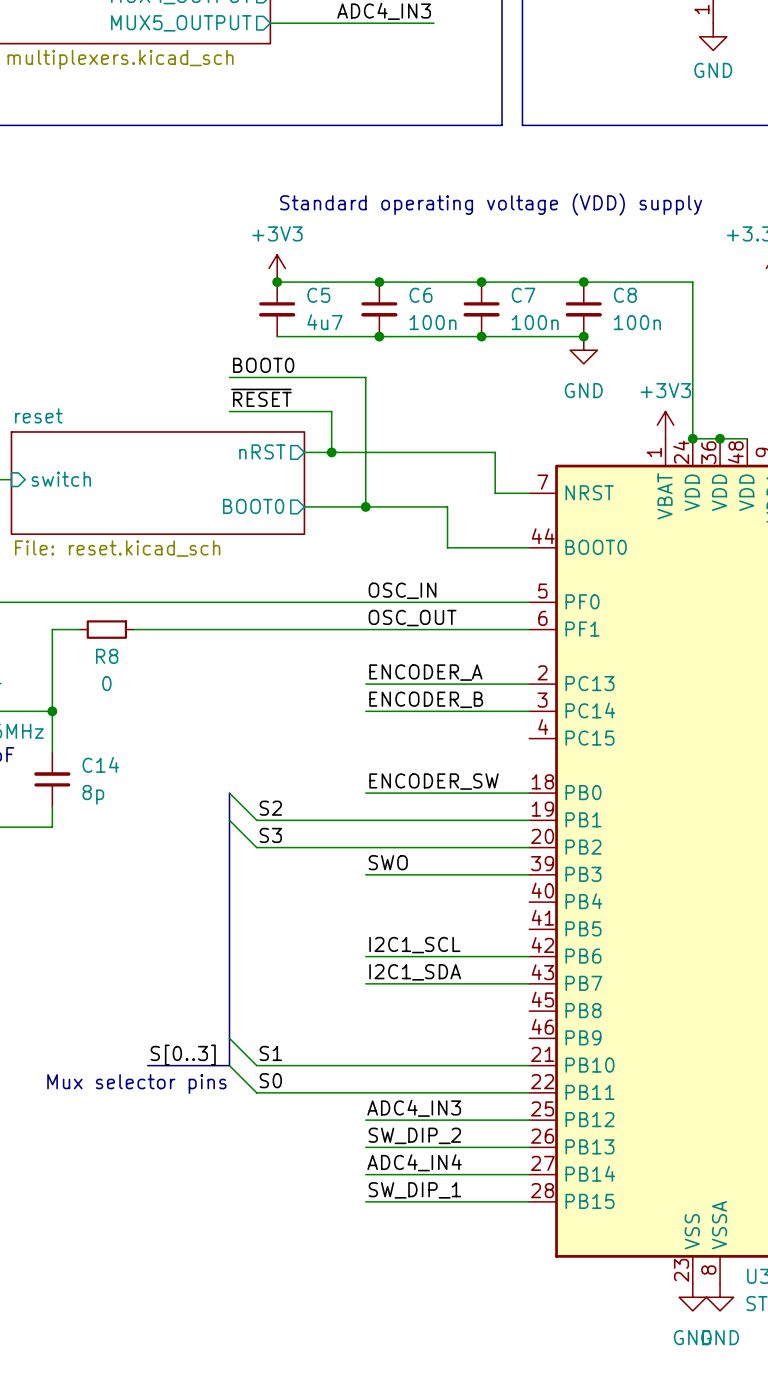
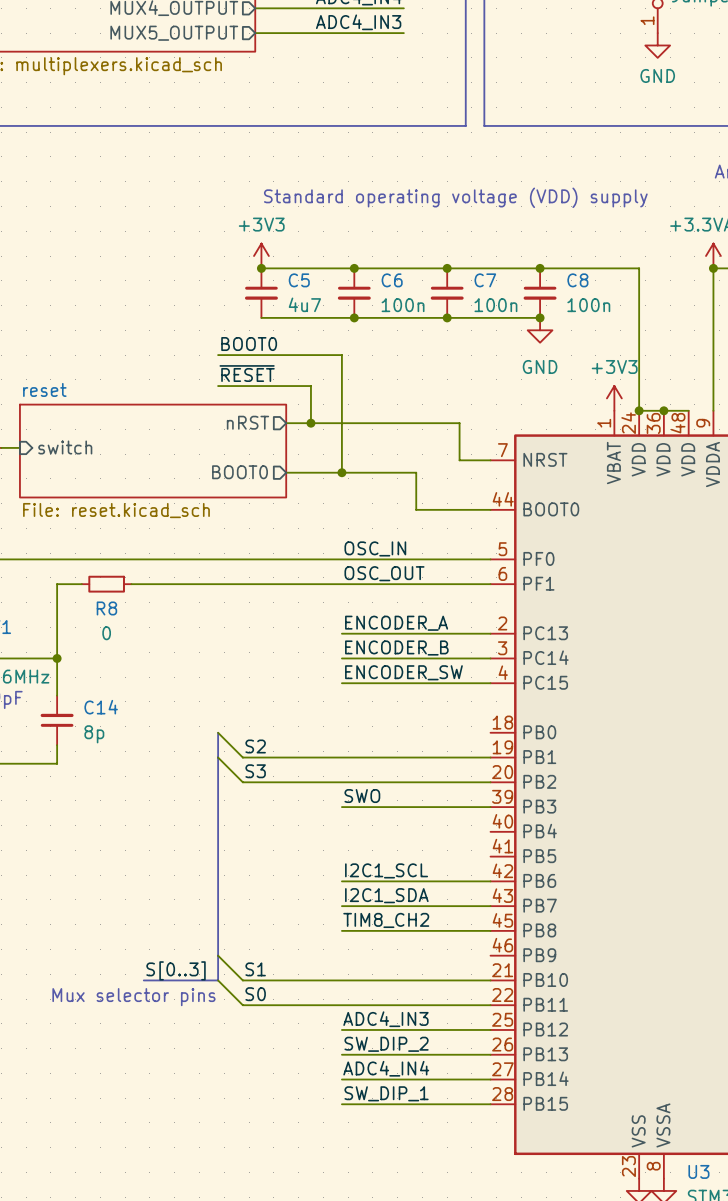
label position: ENCODER_SW (433, 781) -> ENCODER_SW (403, 672)
wire: (365, 793) (529, 793) -> (341, 683) (490, 683)
label: none -> TIM8_CH2 (386, 920)
wire: none -> (341, 930) (490, 930)

